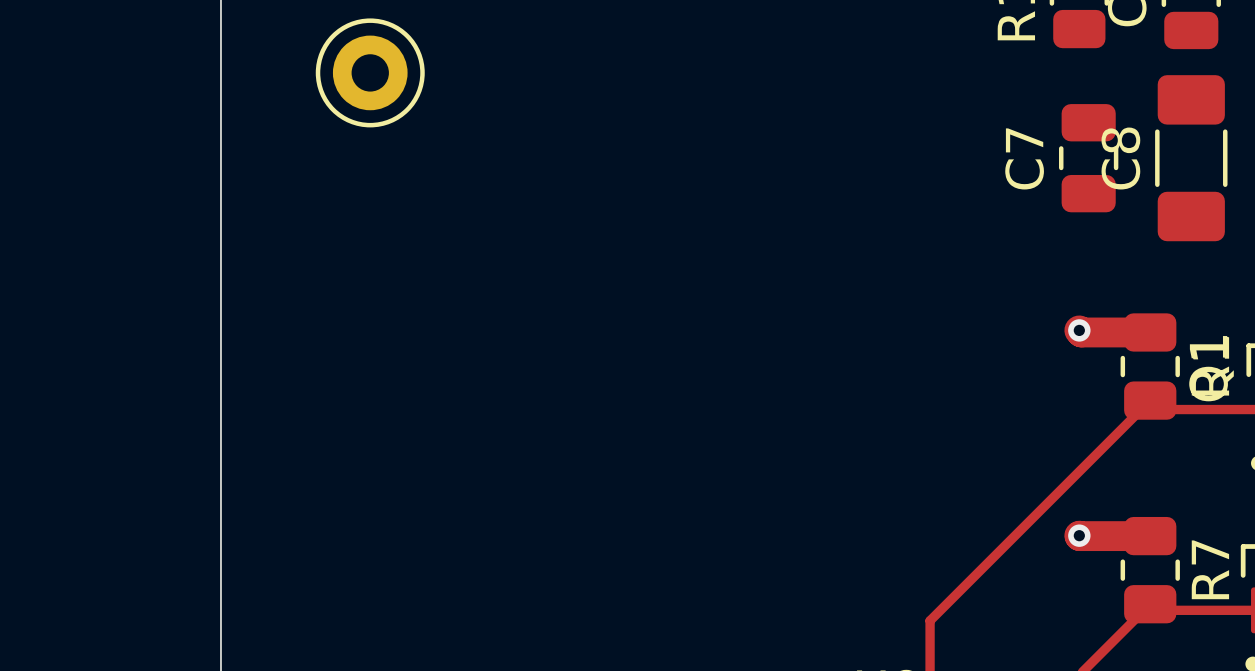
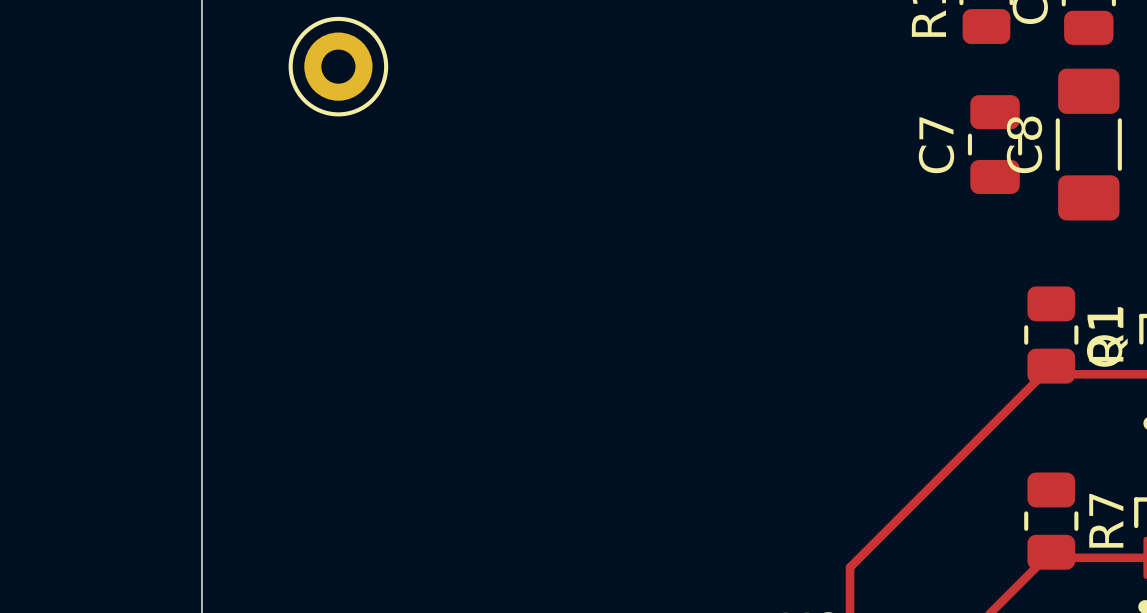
track: (1079, 330) (1081, 332) (1150, 332) -> none
via: (1079, 330) -> none
via: (1079, 535) -> none
track: (1079, 536) (1150, 536) -> none

